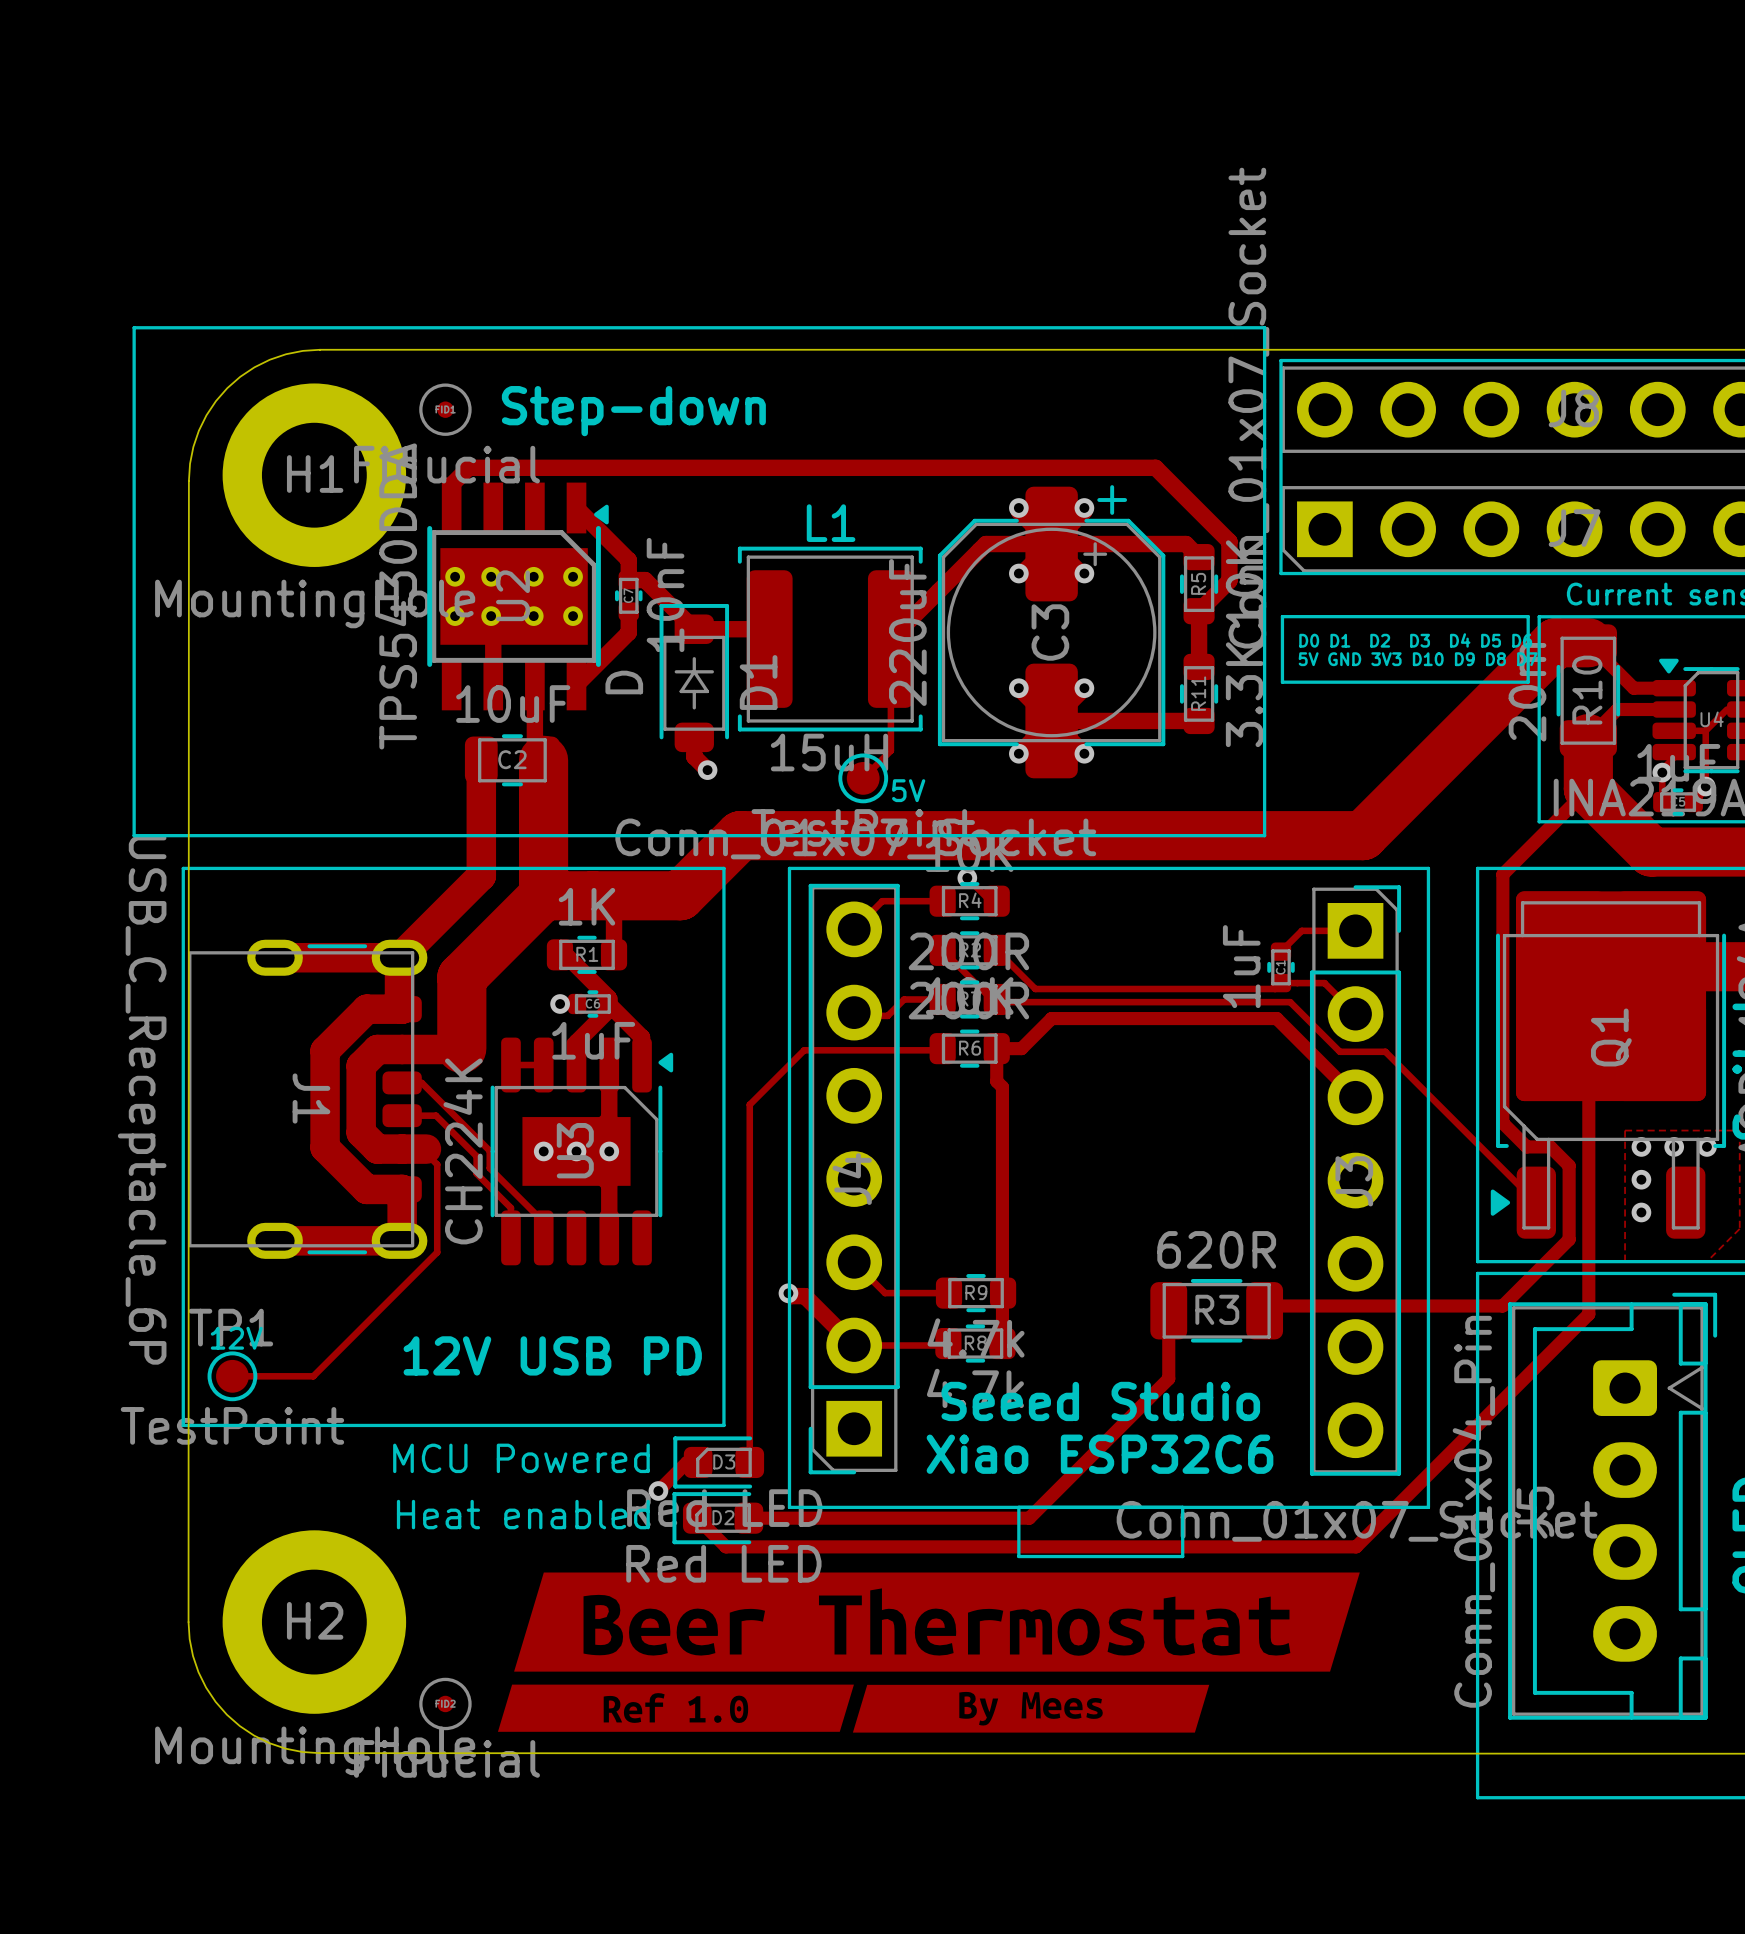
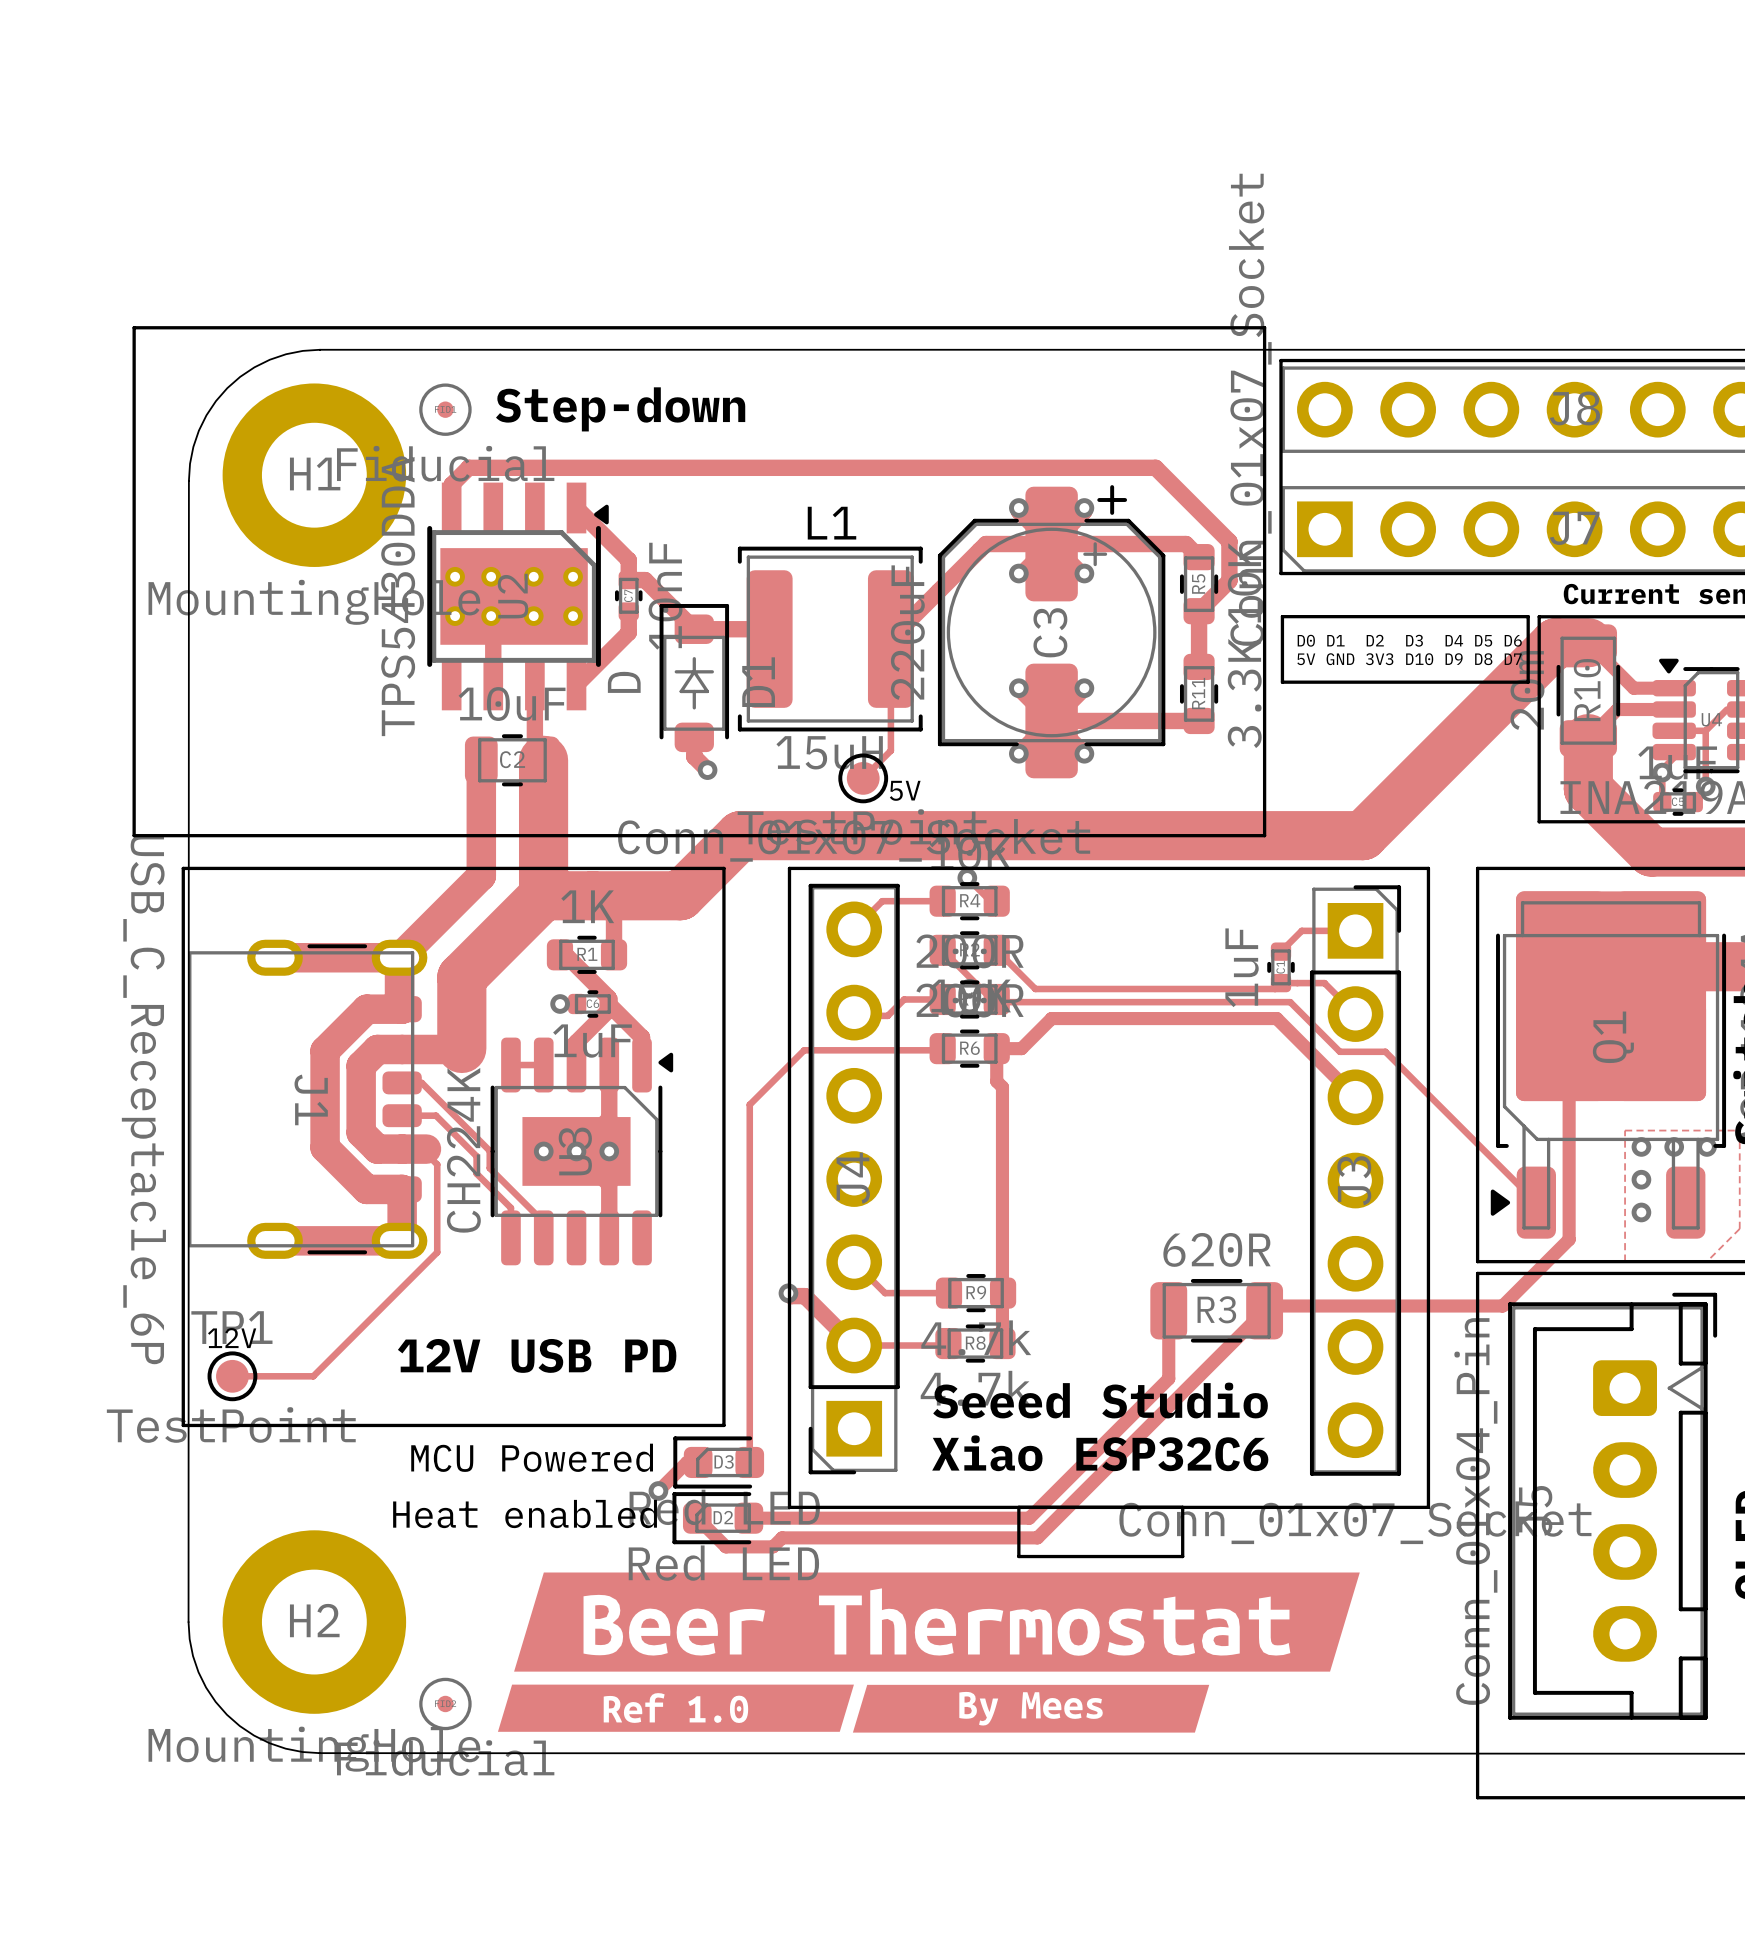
track: (1588, 788) (1502, 874) (1502, 1123) (1526, 1146) (1550, 1146) (1569, 1165) -> (1569, 1059) (1569, 1165)
track: (1569, 1059) (1588, 1078) (1588, 1314) (1356, 1546) (773, 1546) -> (1264, 1310) (1037, 1537) (782, 1537) (773, 1546)

